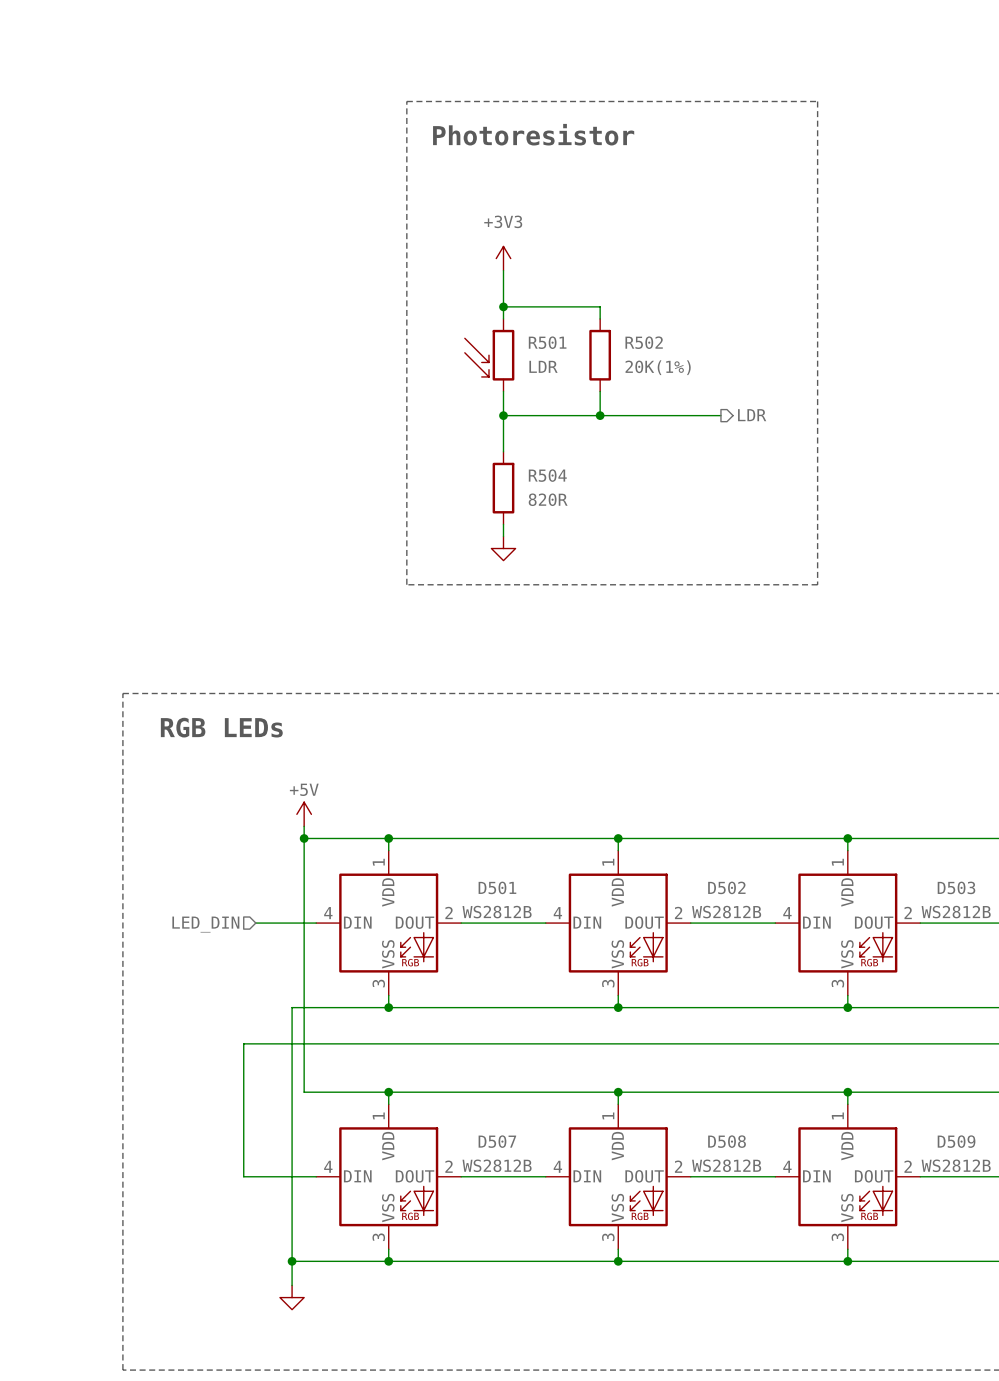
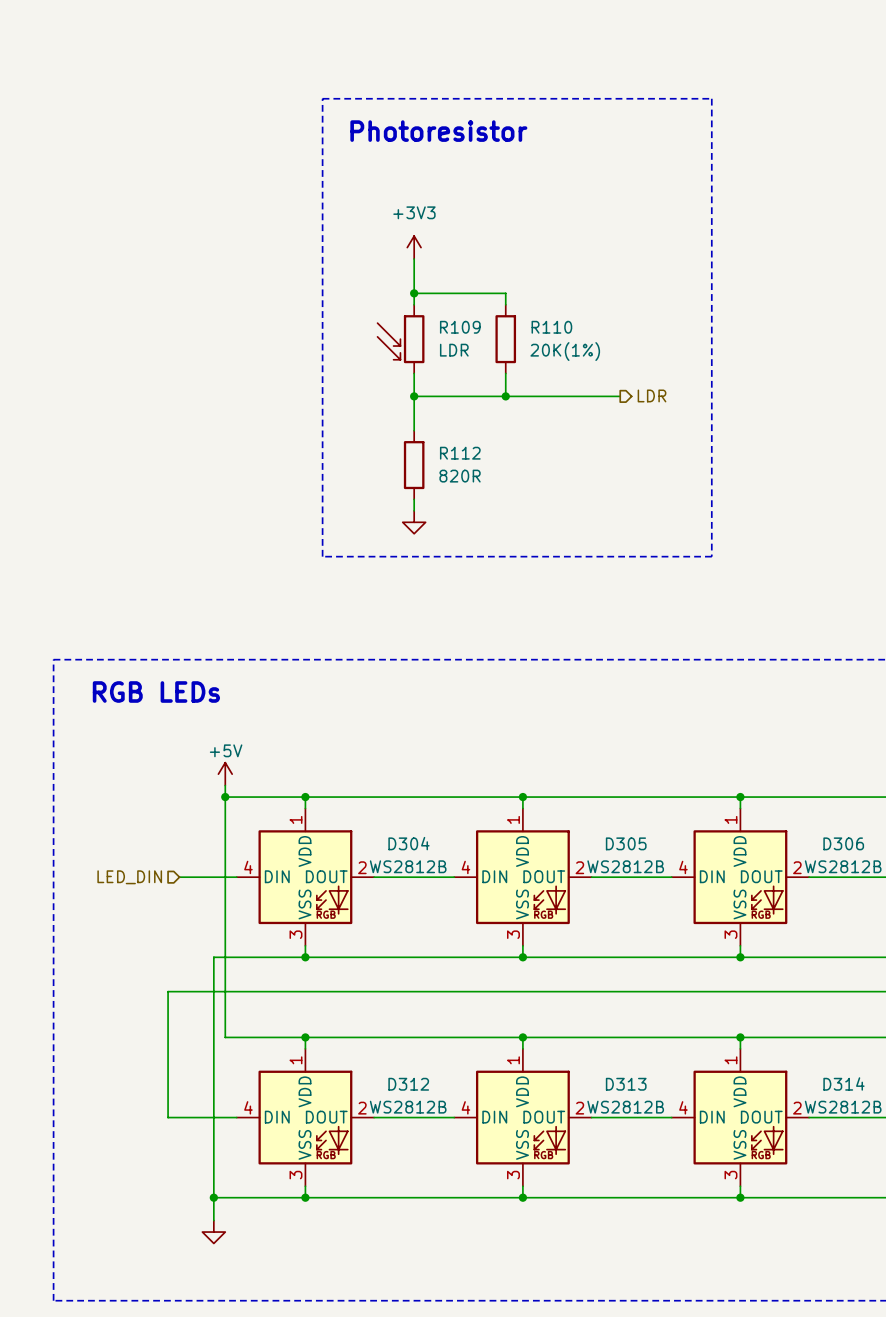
R501 name: R501 (547, 342) -> R109 (460, 327)
R502 name: R502 (644, 342) -> R110 (551, 327)
R504 name: R504 (547, 475) -> R112 (460, 453)
D501 name: D501 (497, 887) -> D304 (408, 843)
D502 name: D502 (726, 887) -> D305 (626, 843)
D503 name: D503 (956, 887) -> D306 (843, 843)
D507 name: D507 (497, 1141) -> D312 (408, 1084)
D508 name: D508 (727, 1141) -> D313 (626, 1084)
D509 name: D509 (956, 1141) -> D314 (843, 1083)

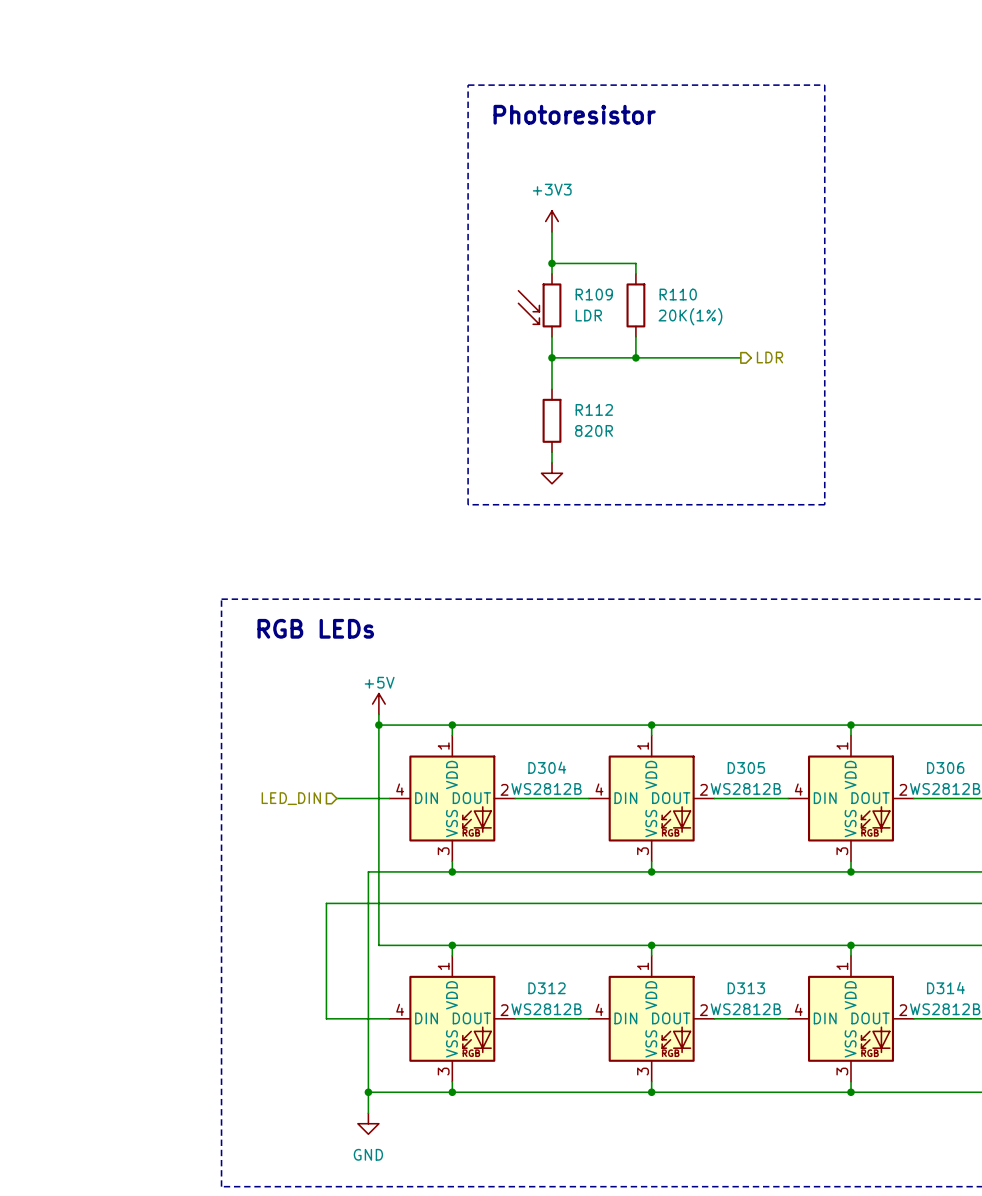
power symbol text: none -> GND (368, 1154)

